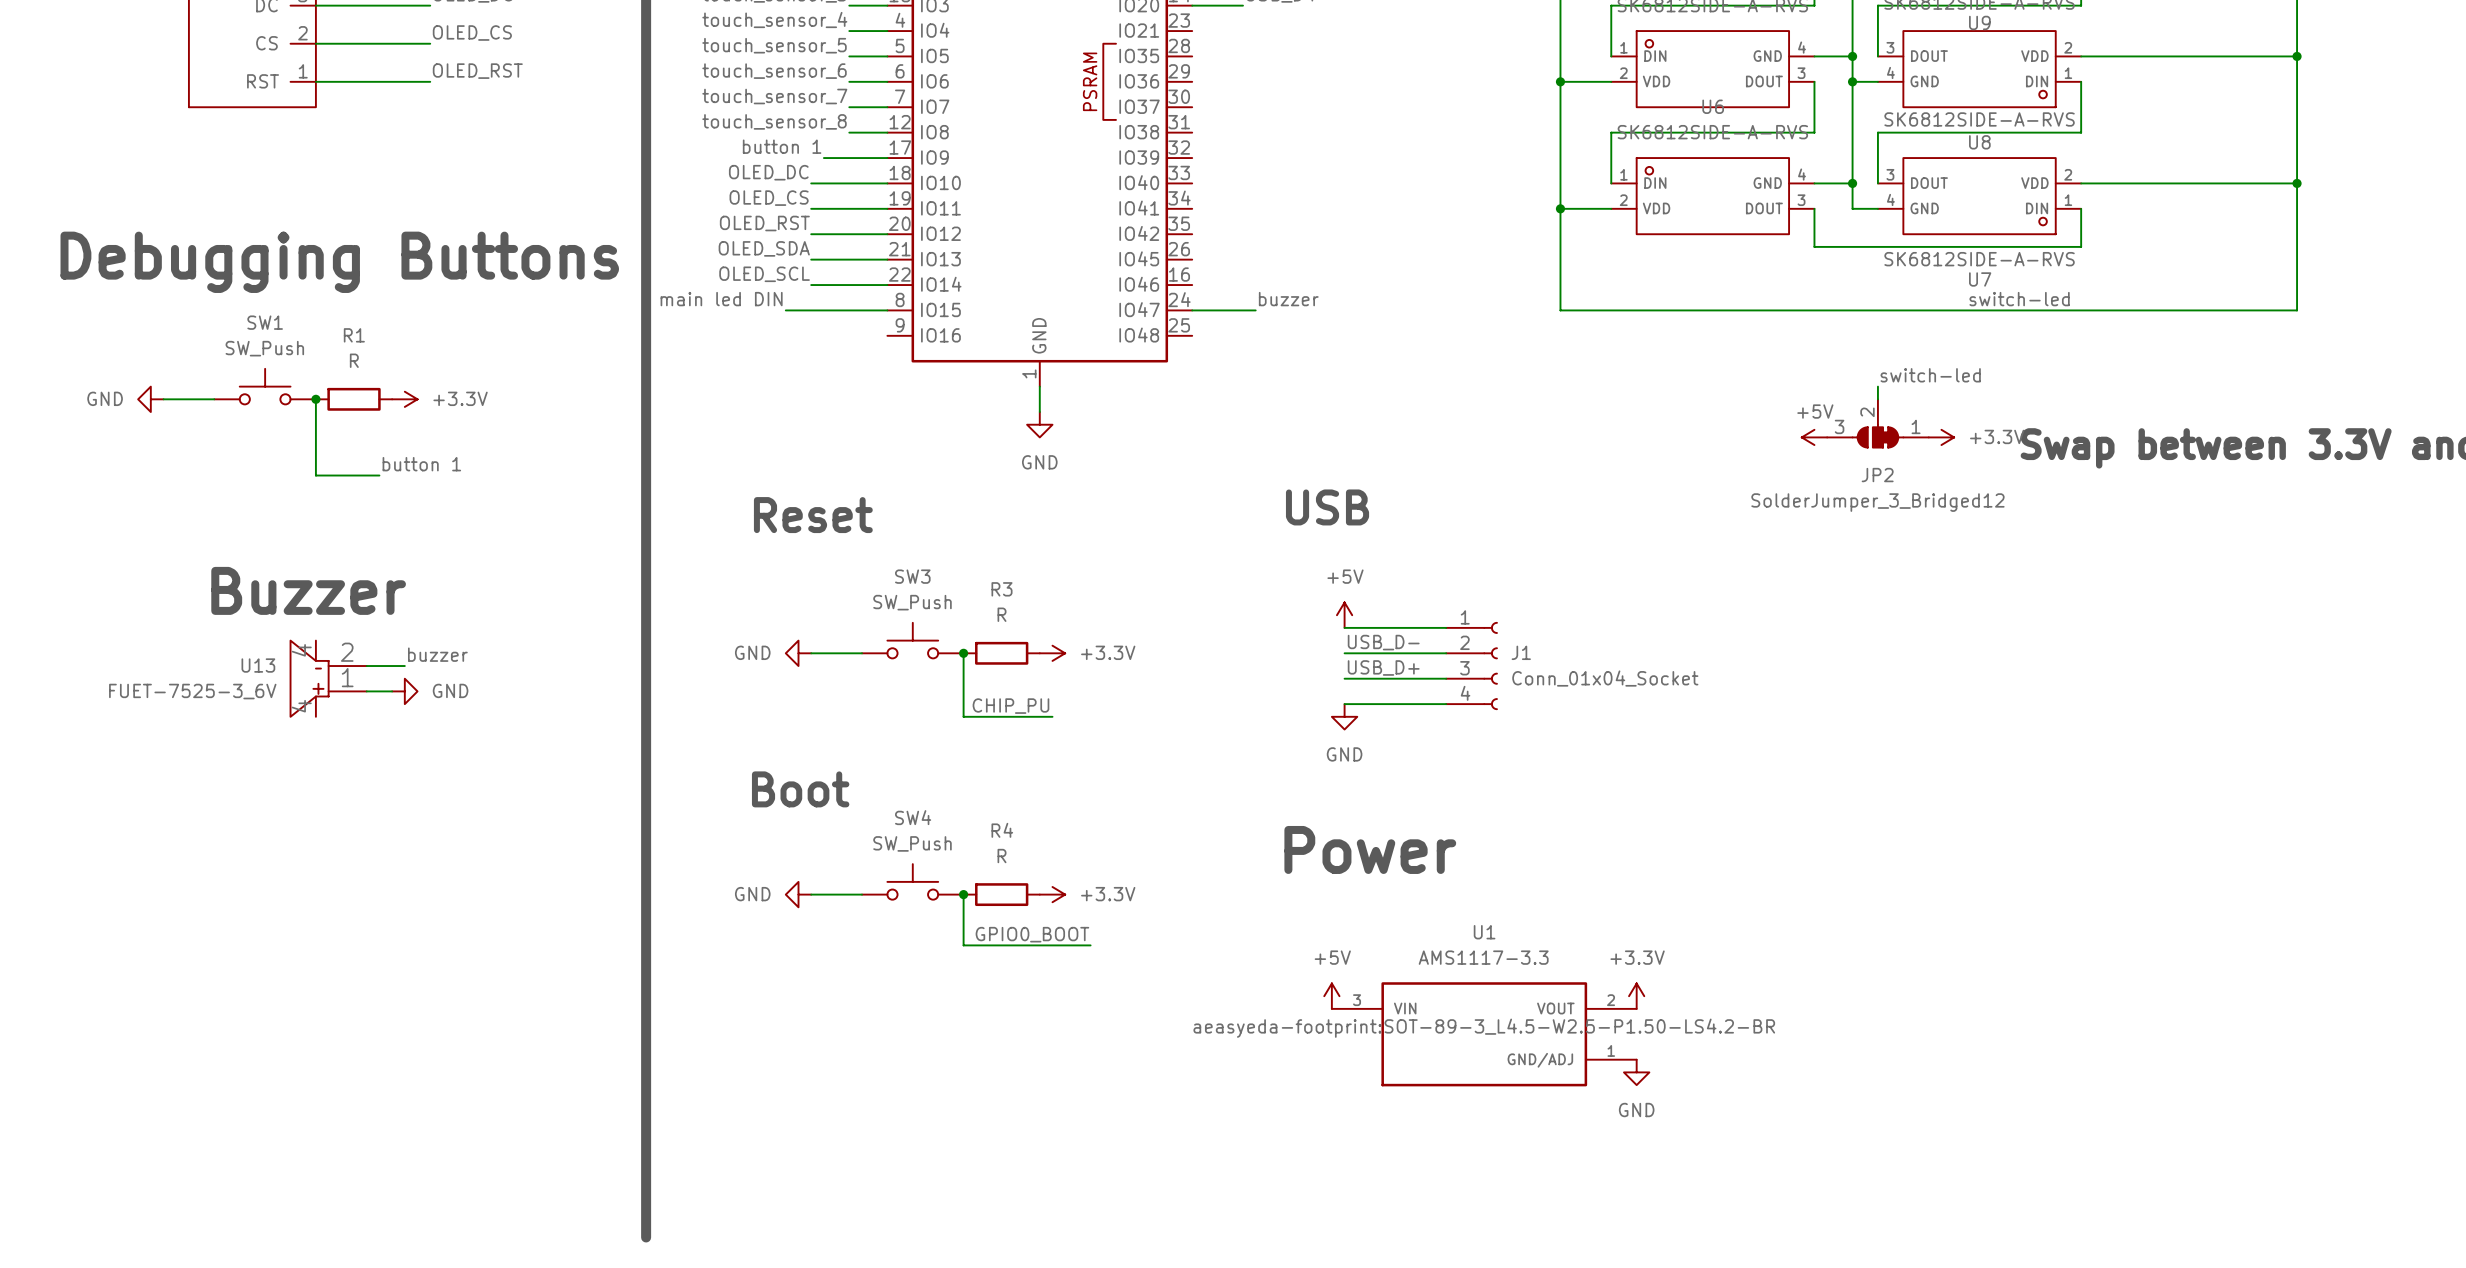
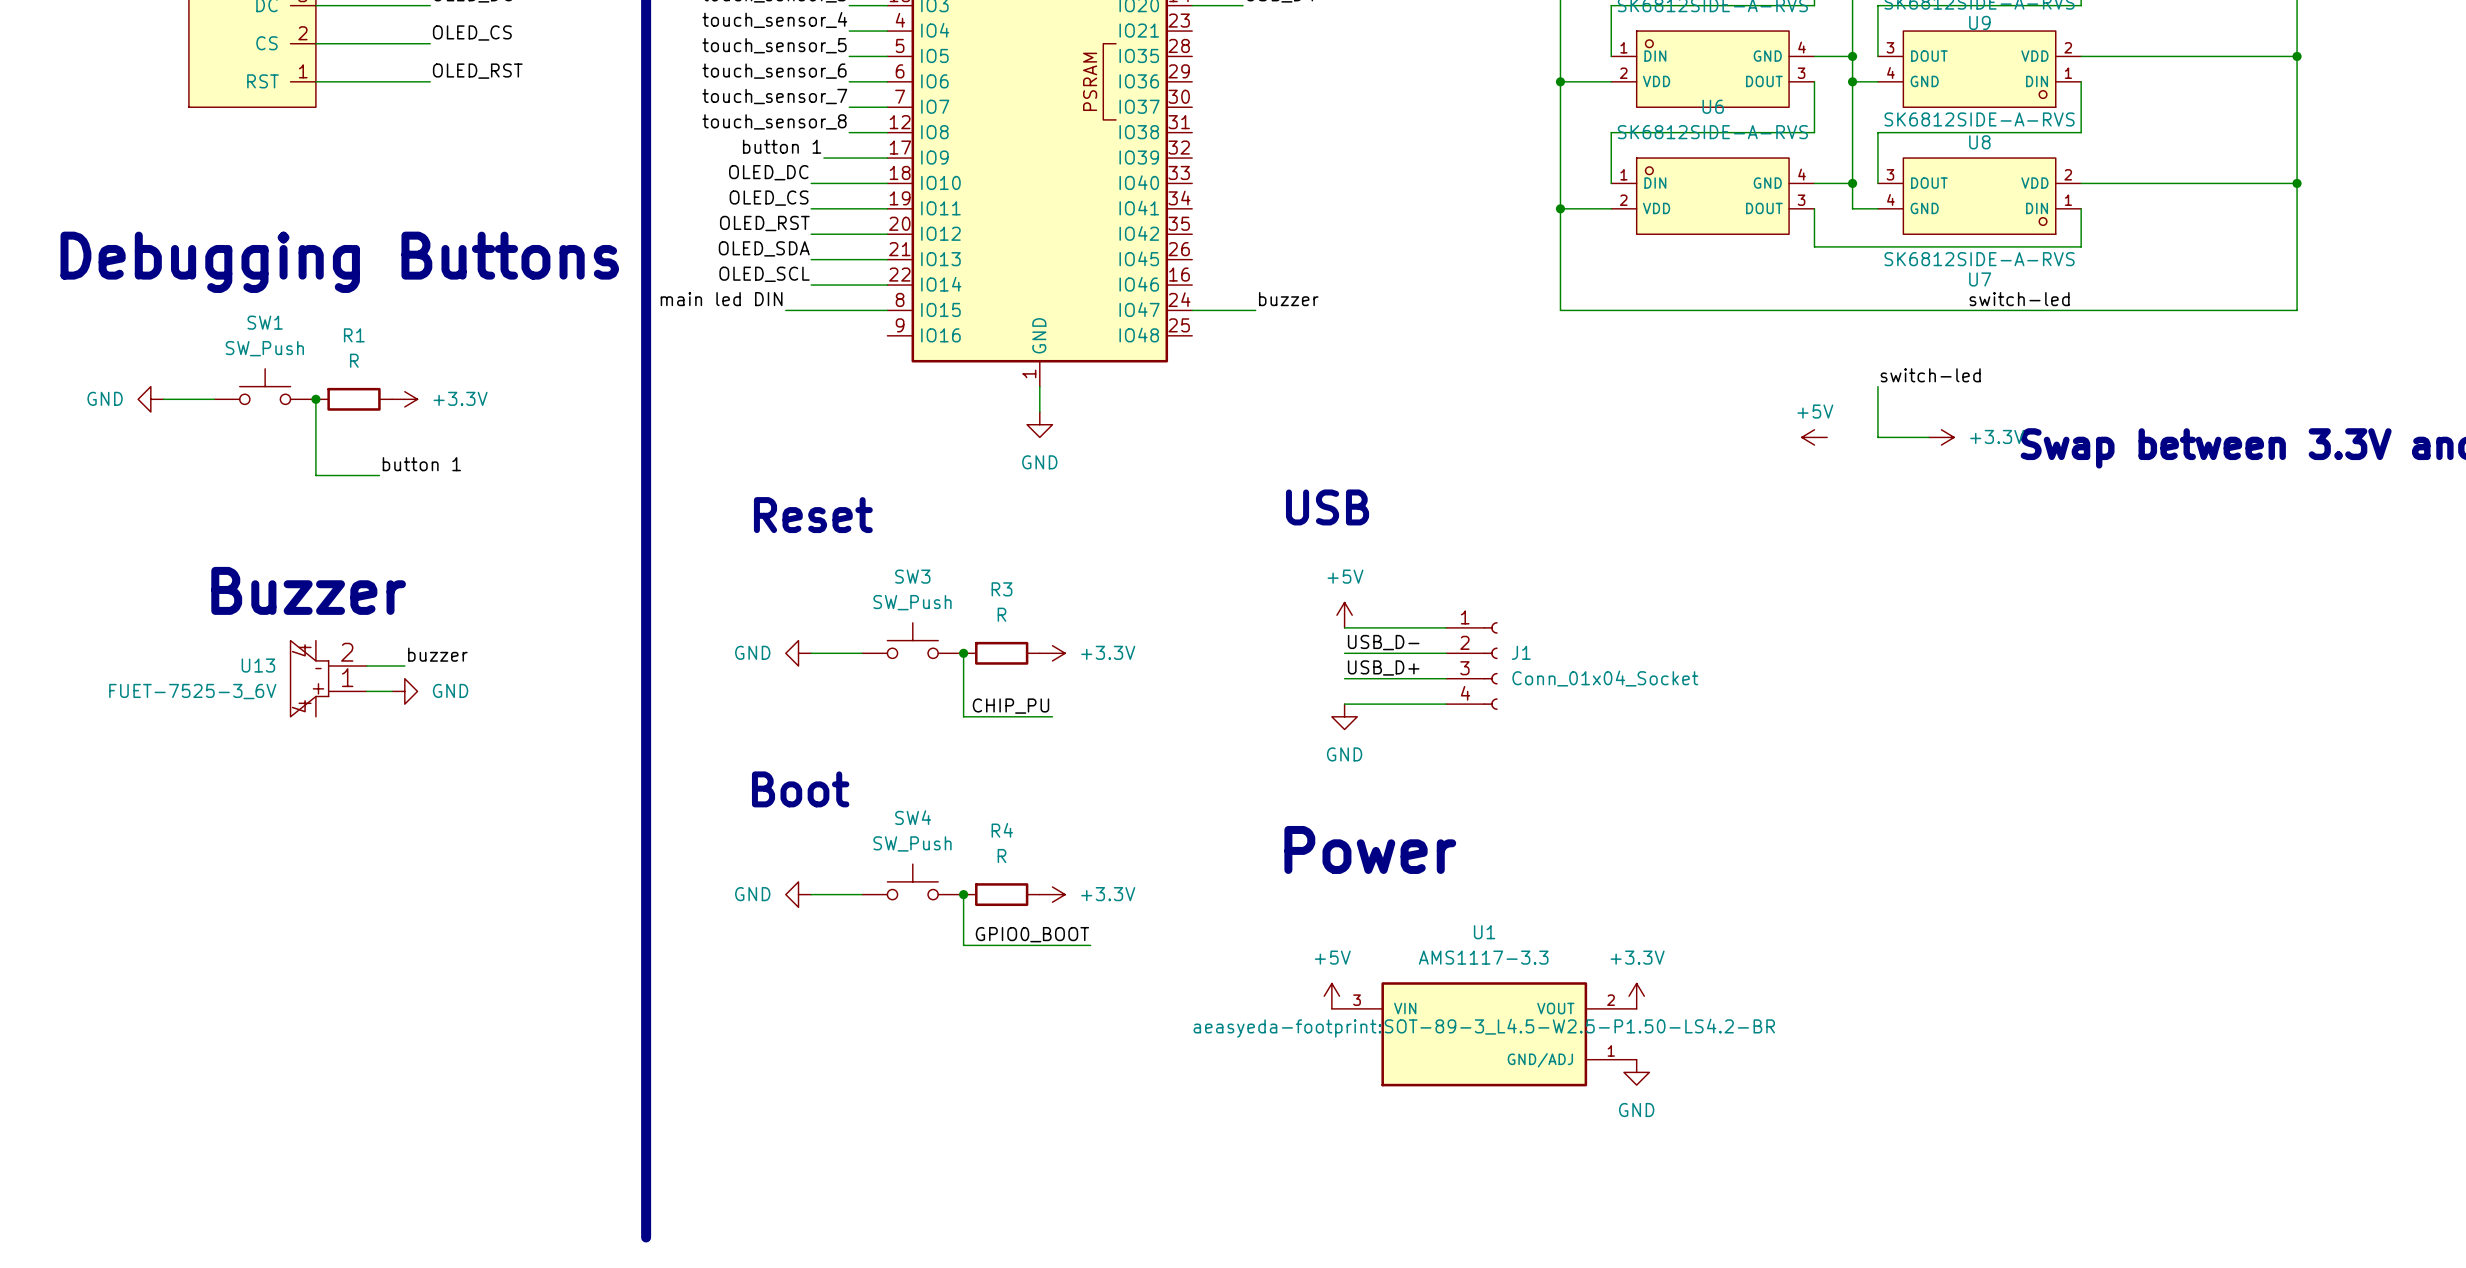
JP2: SolderJumper_3_Bridged12 (1877, 423) -> none

